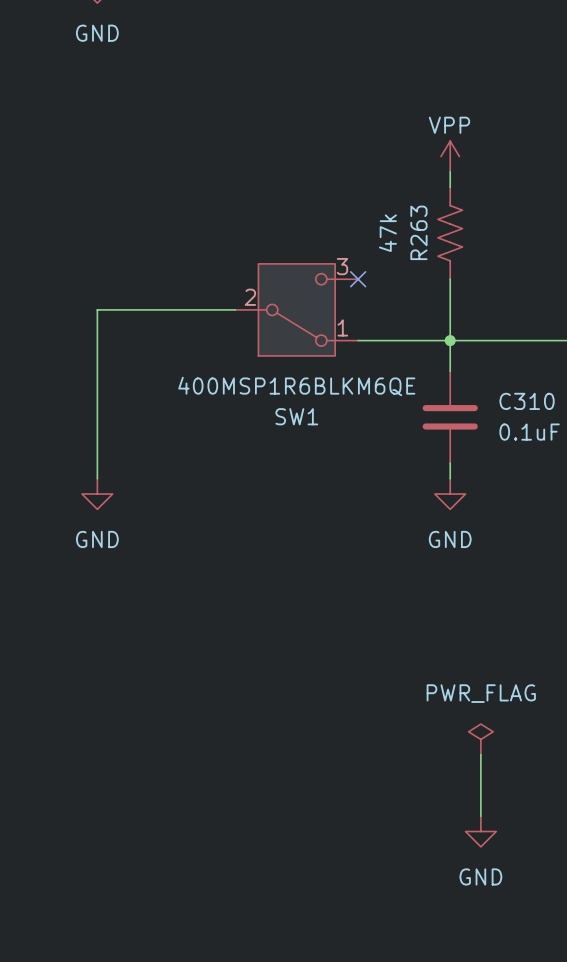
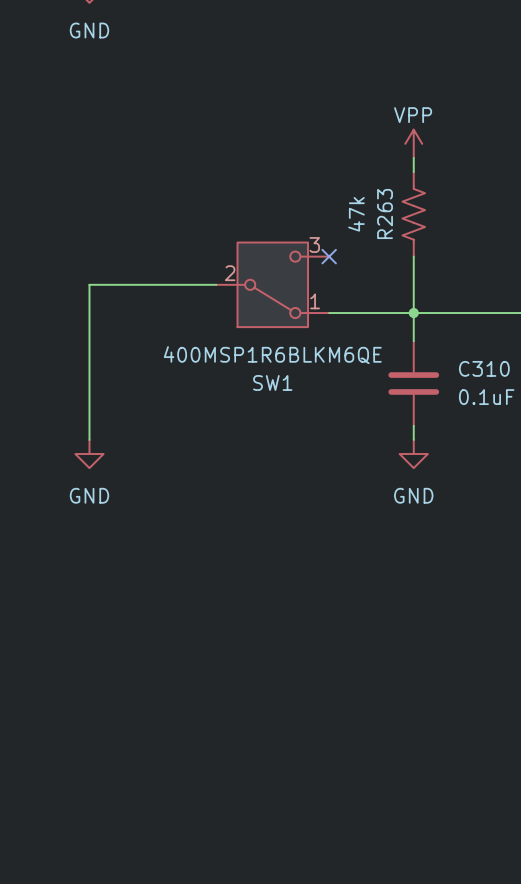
power symbol: PWR_FLAG (480, 739) -> none
wire: (480, 754) (480, 816) -> none
power symbol: GND (480, 831) -> none

